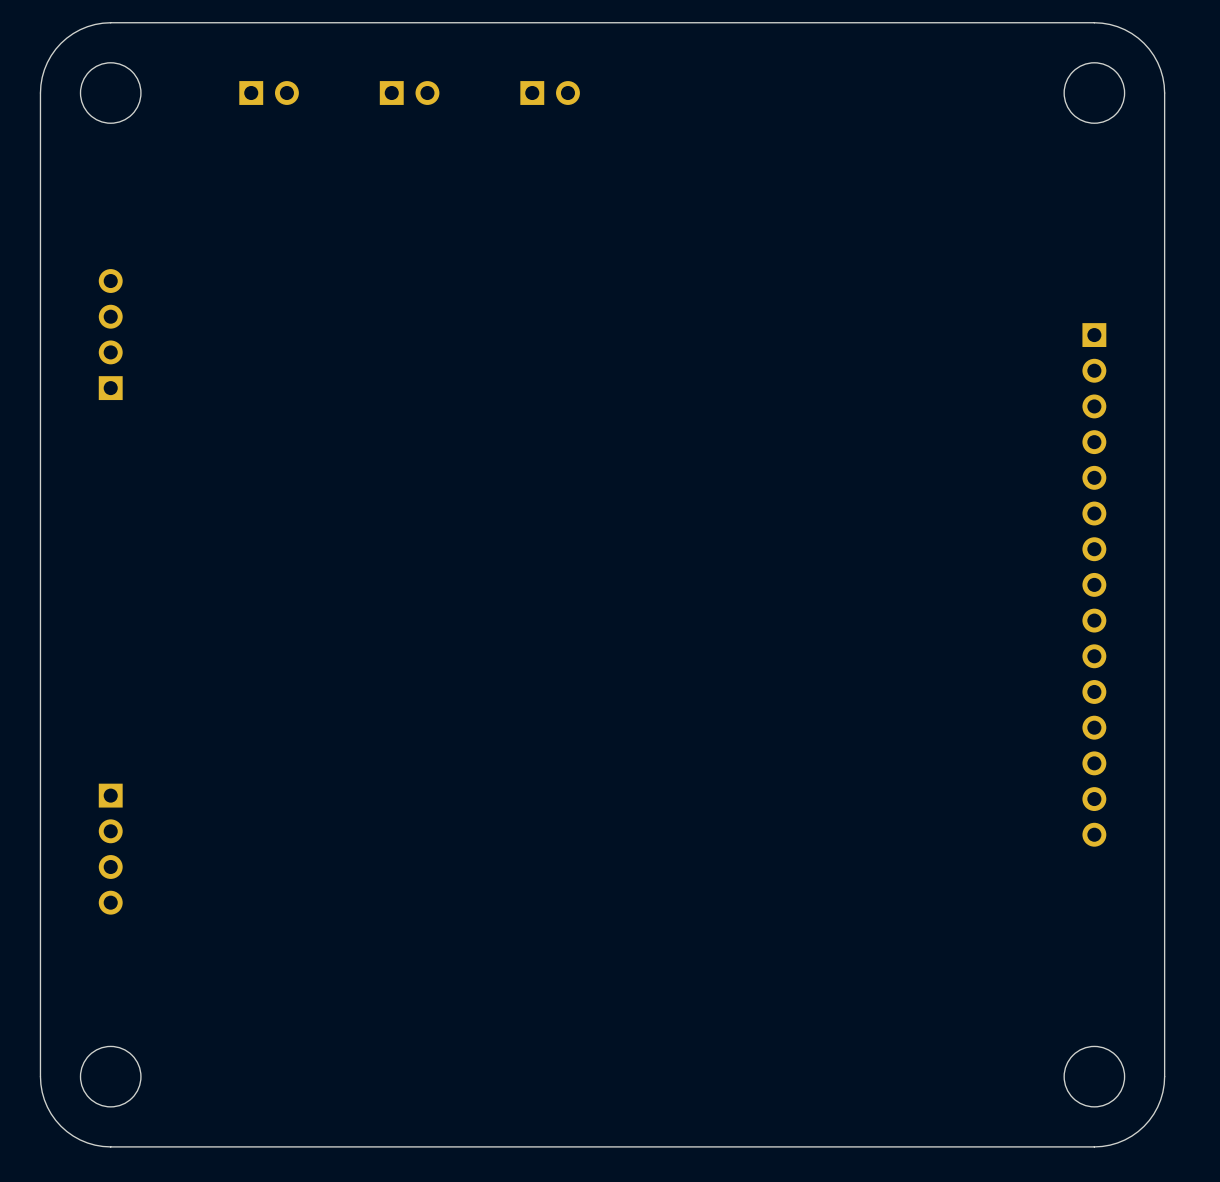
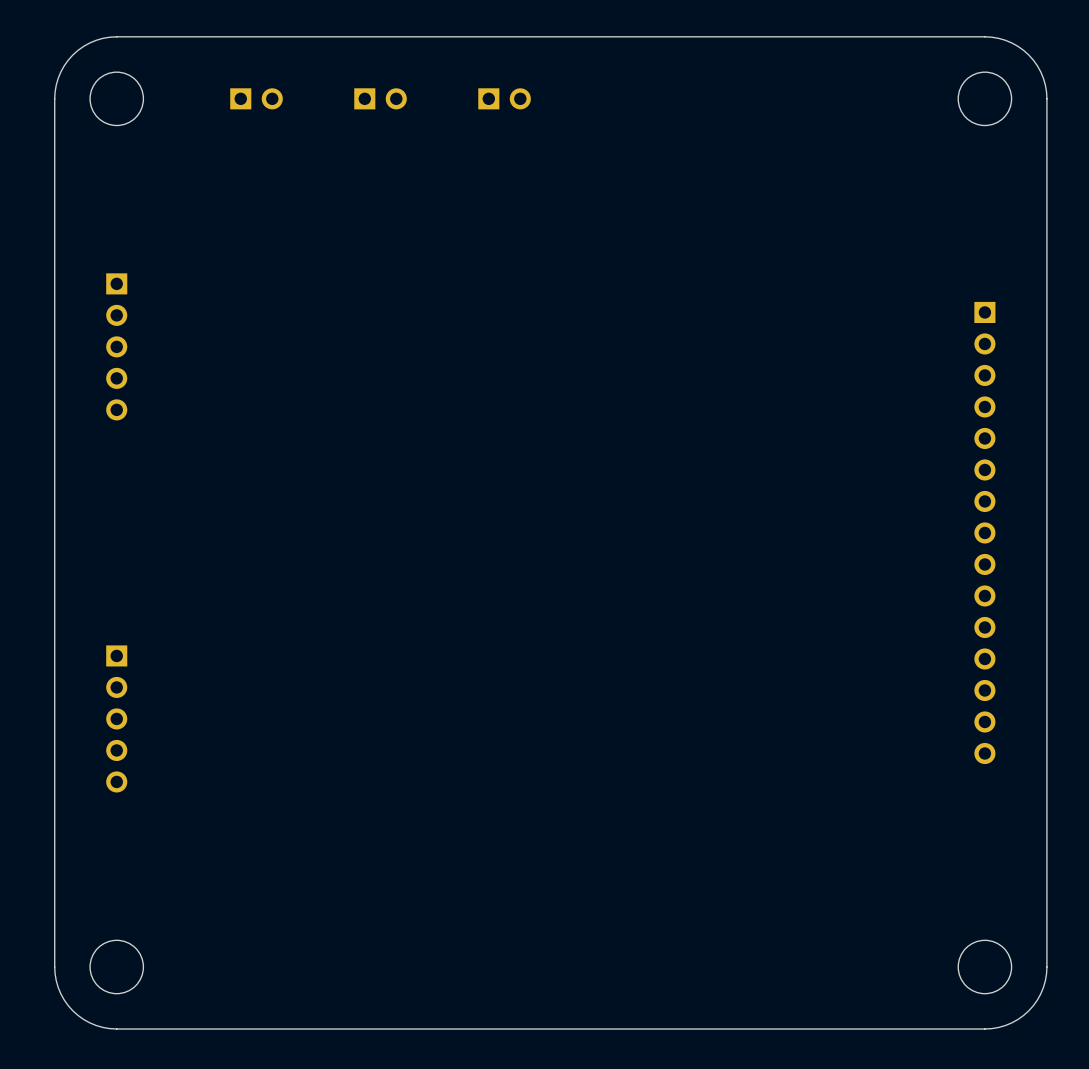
part: (110, 334) -> none
part: none -> (116, 346)
part: none -> (116, 718)
part: (110, 849) -> none

